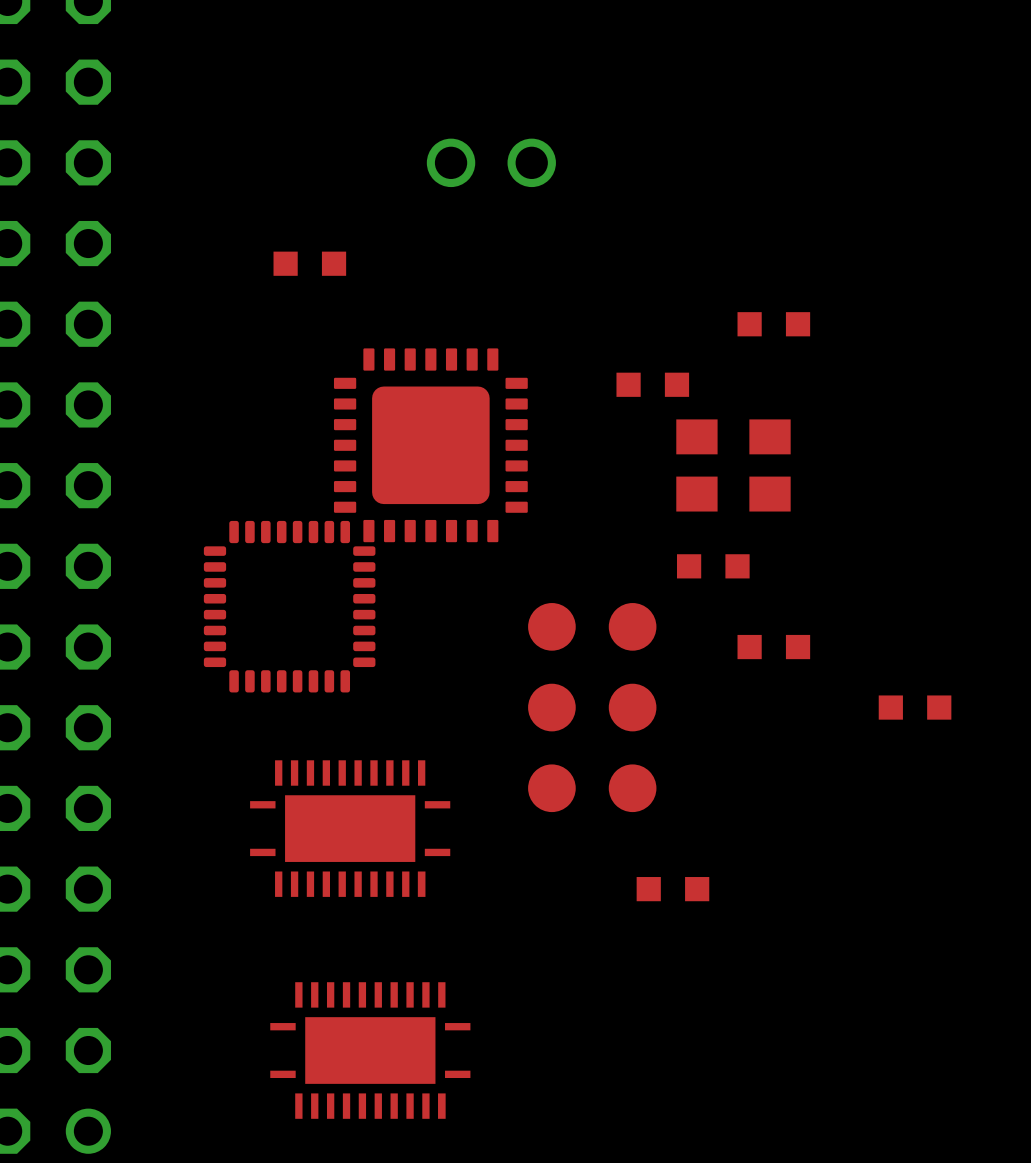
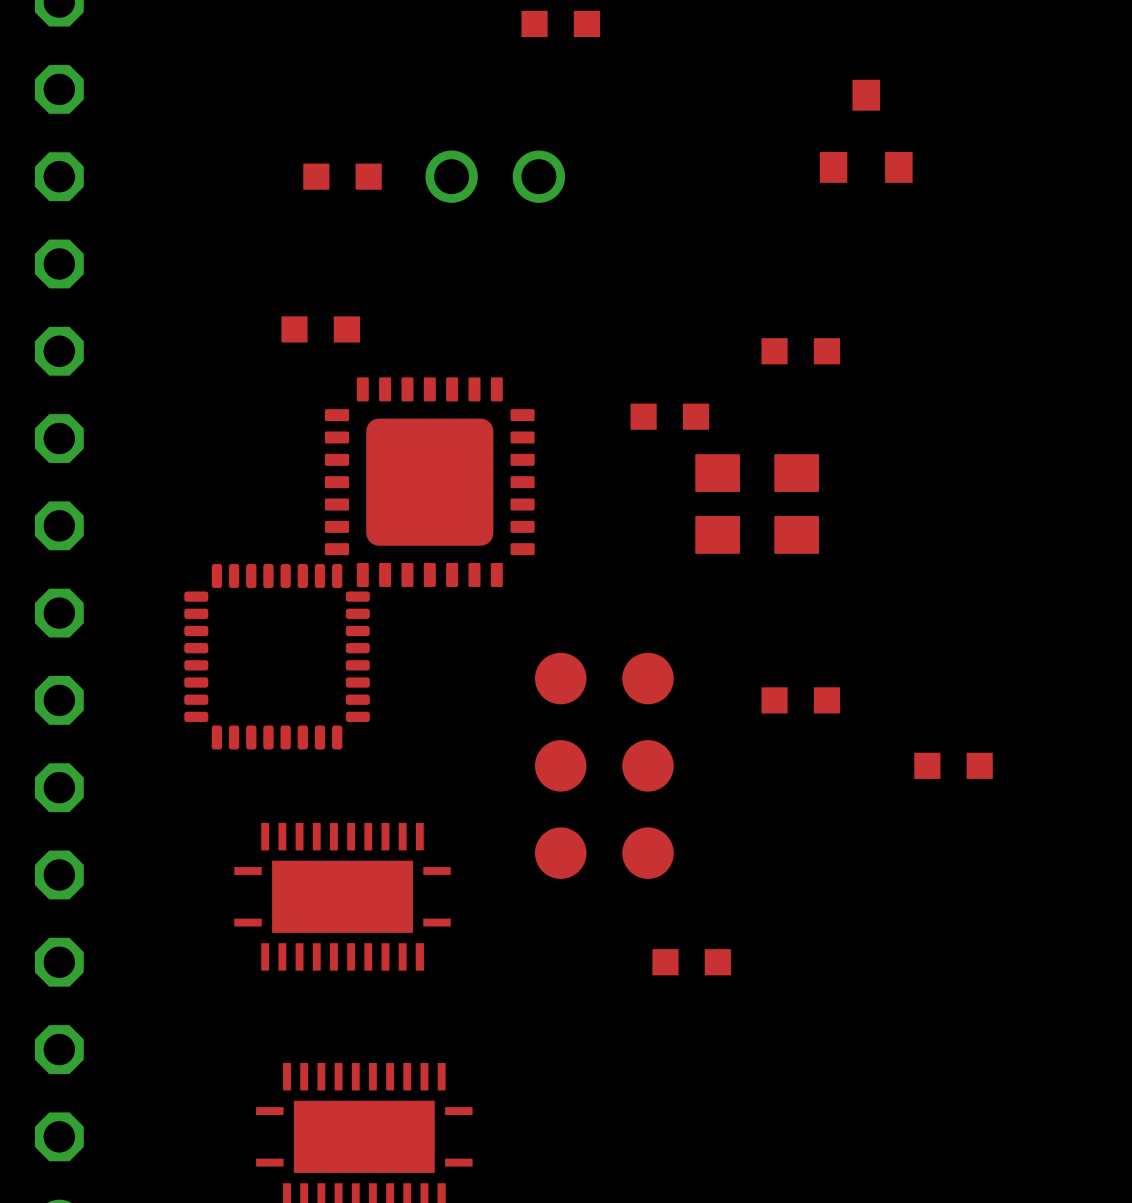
part: none -> (560, 23)
part: none -> (866, 131)
part: none -> (342, 176)
part position: (309, 263) -> (320, 329)
part: (713, 566) -> none

